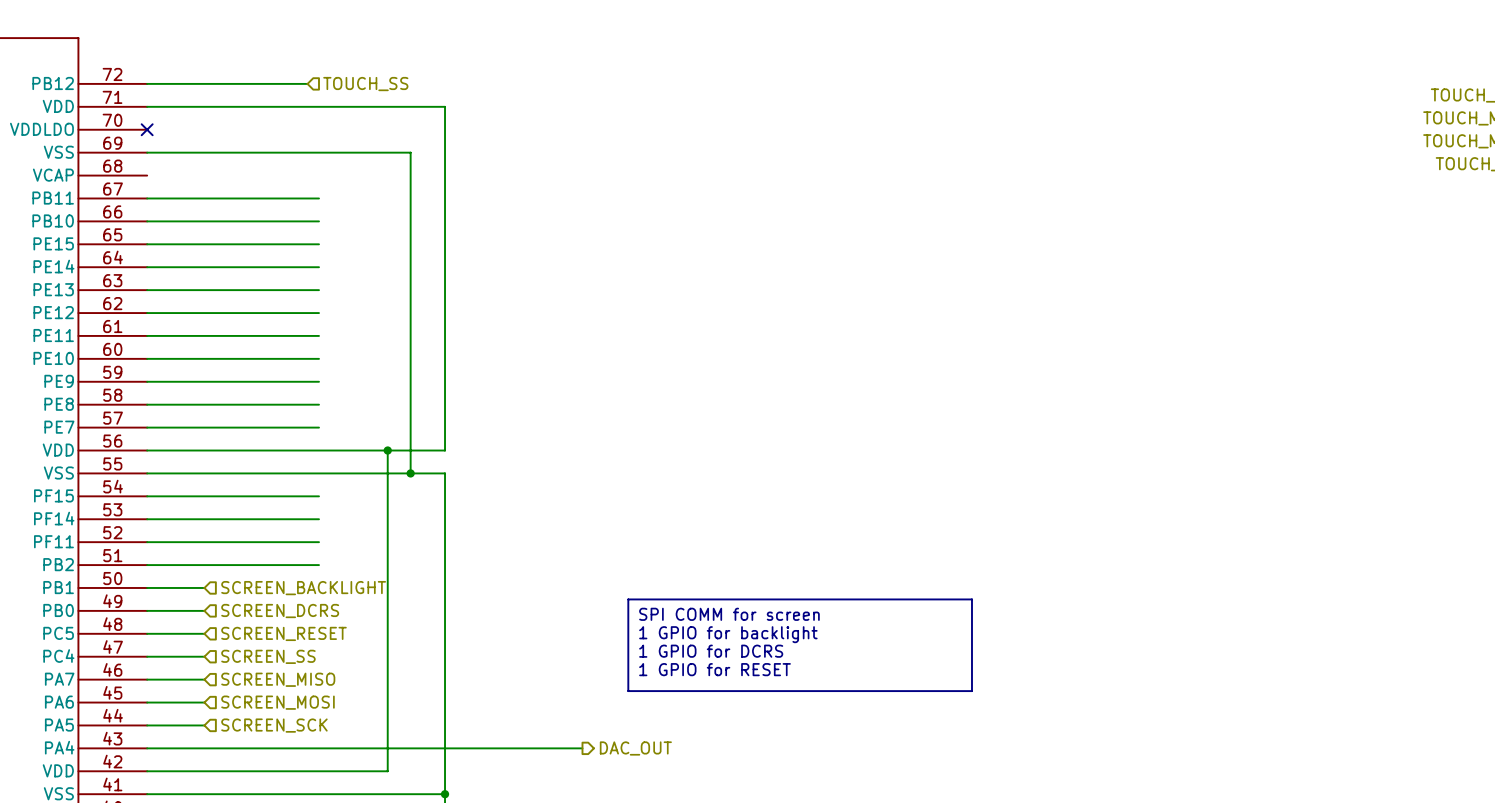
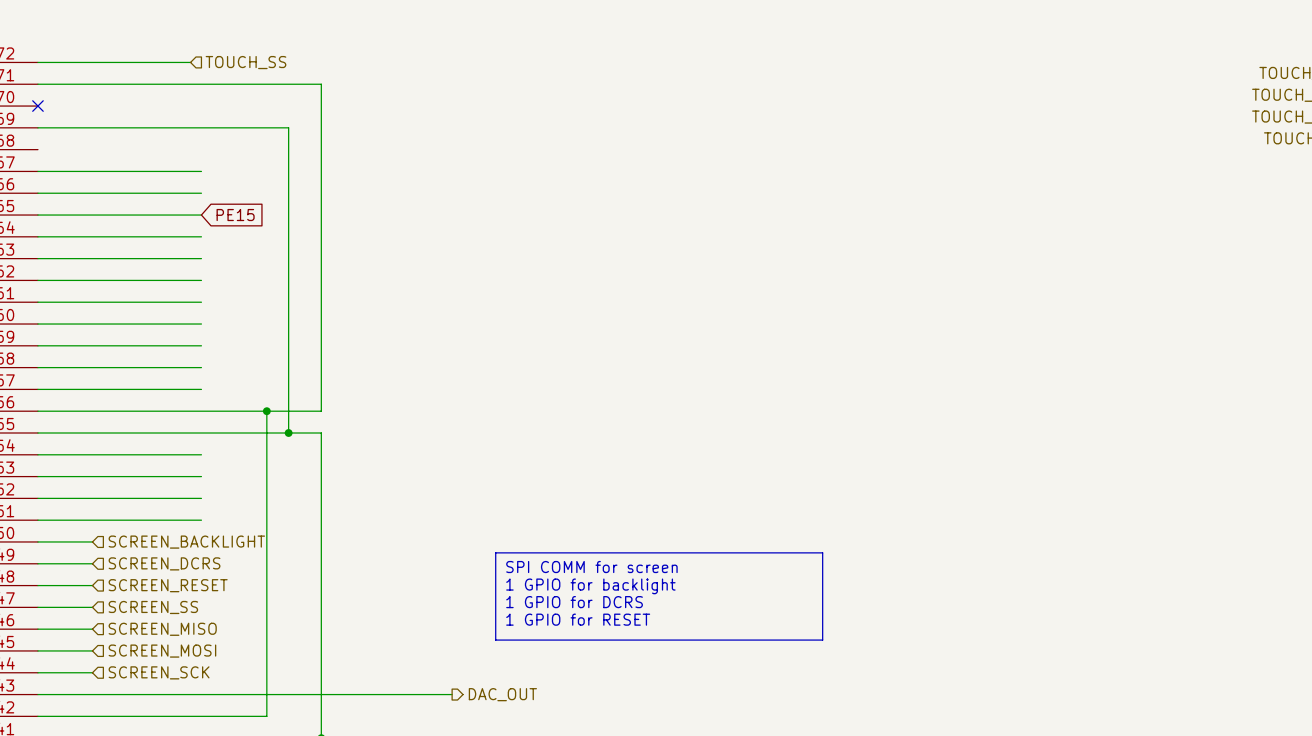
global label: none -> PE15 (235, 215)

